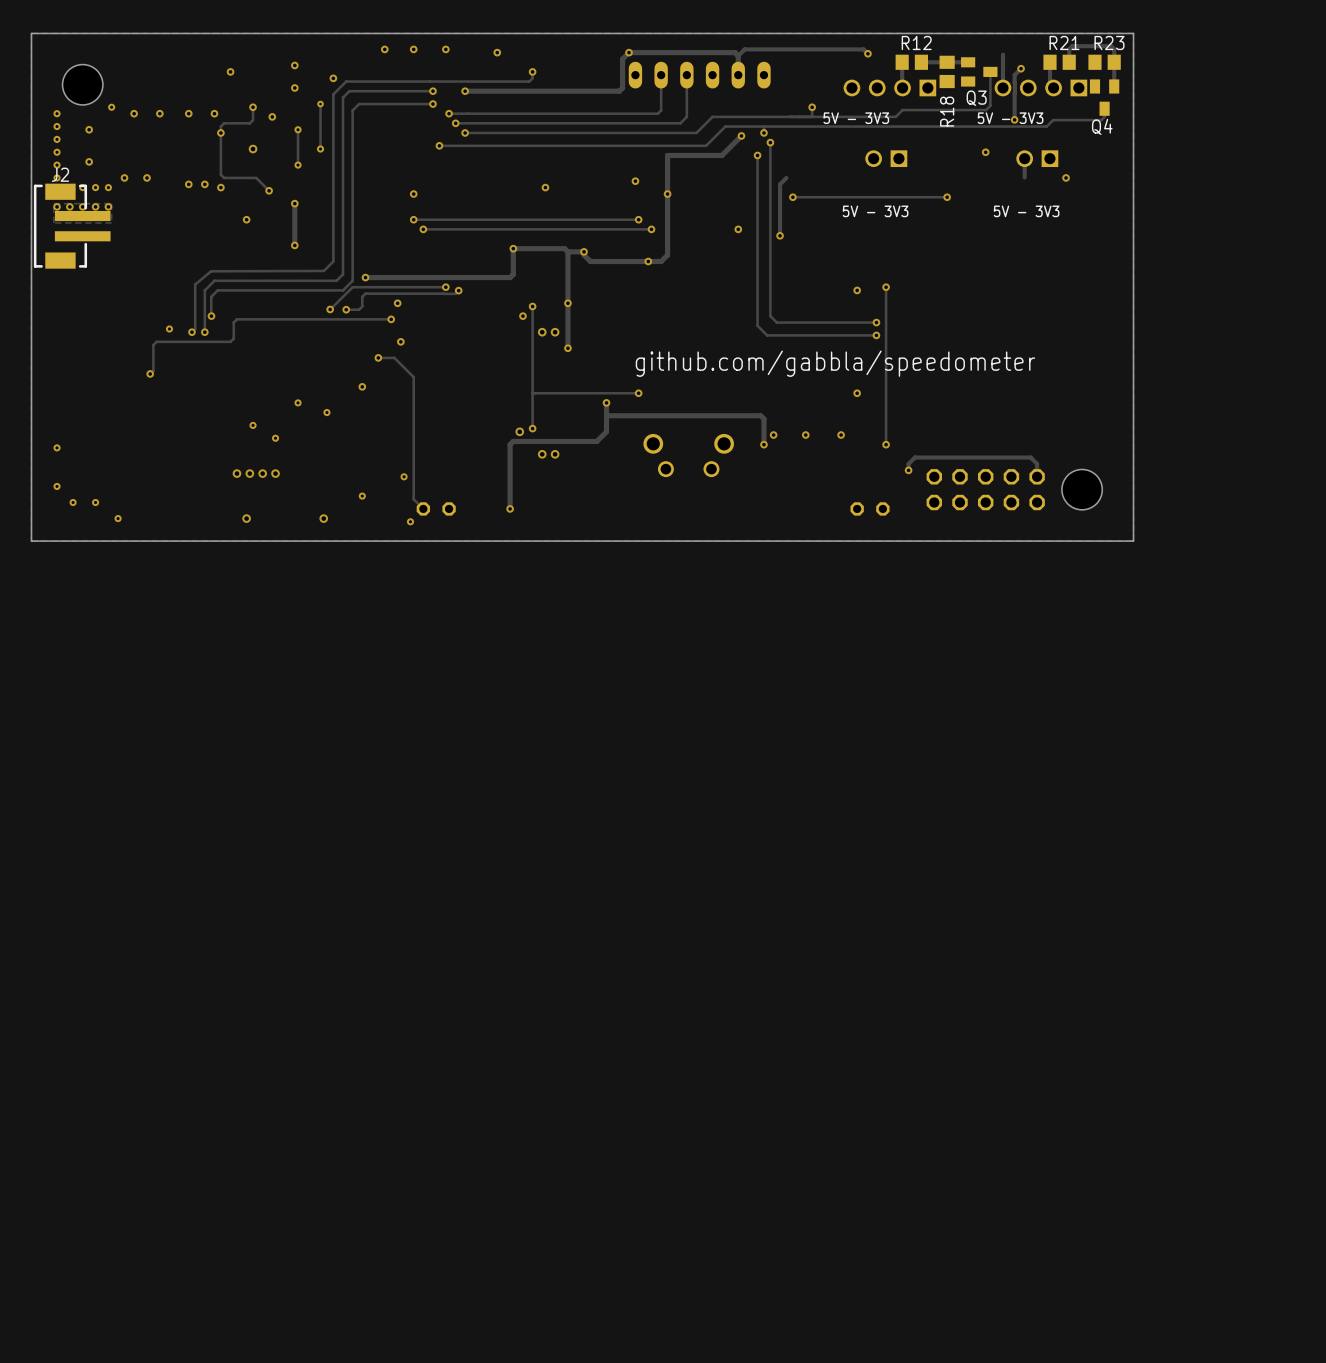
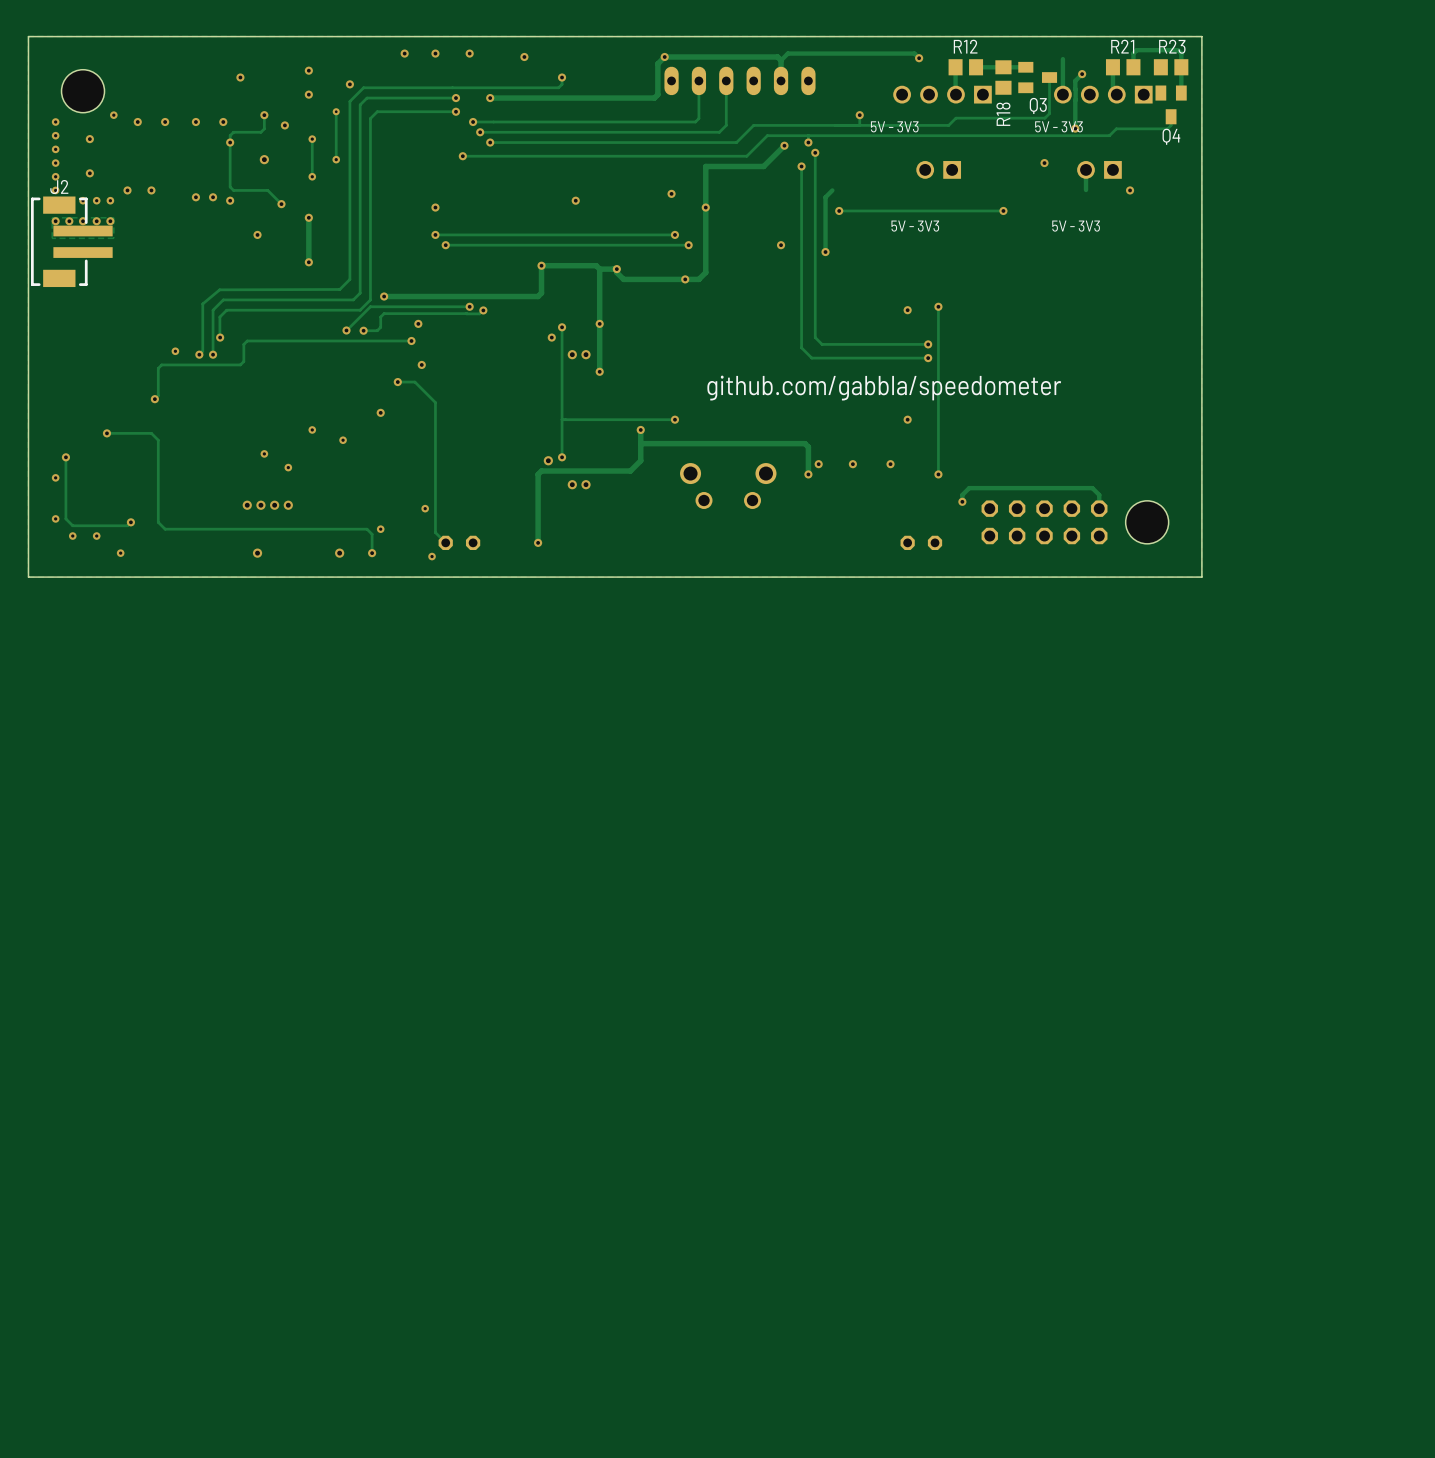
track: none -> (106, 433) (151, 433) (158, 440) (158, 522) (165, 529) (367, 529) (372, 534) (372, 553)
via: none -> (106, 433)
track: none -> (65, 457) (65, 518) (72, 525) (127, 525) (130, 522)
via: none -> (65, 457)
via: none -> (130, 522)
via: none -> (372, 553)

